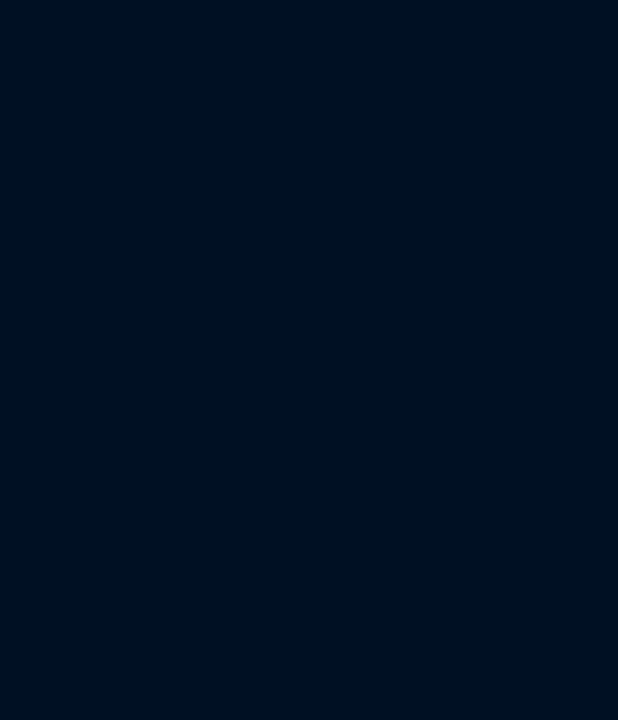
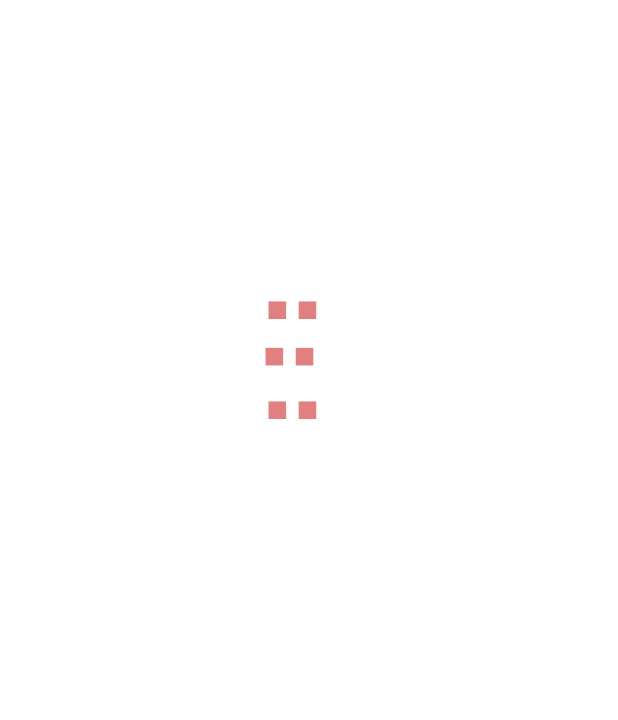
part: none -> (292, 310)
part: none -> (289, 356)
part: none -> (292, 410)

